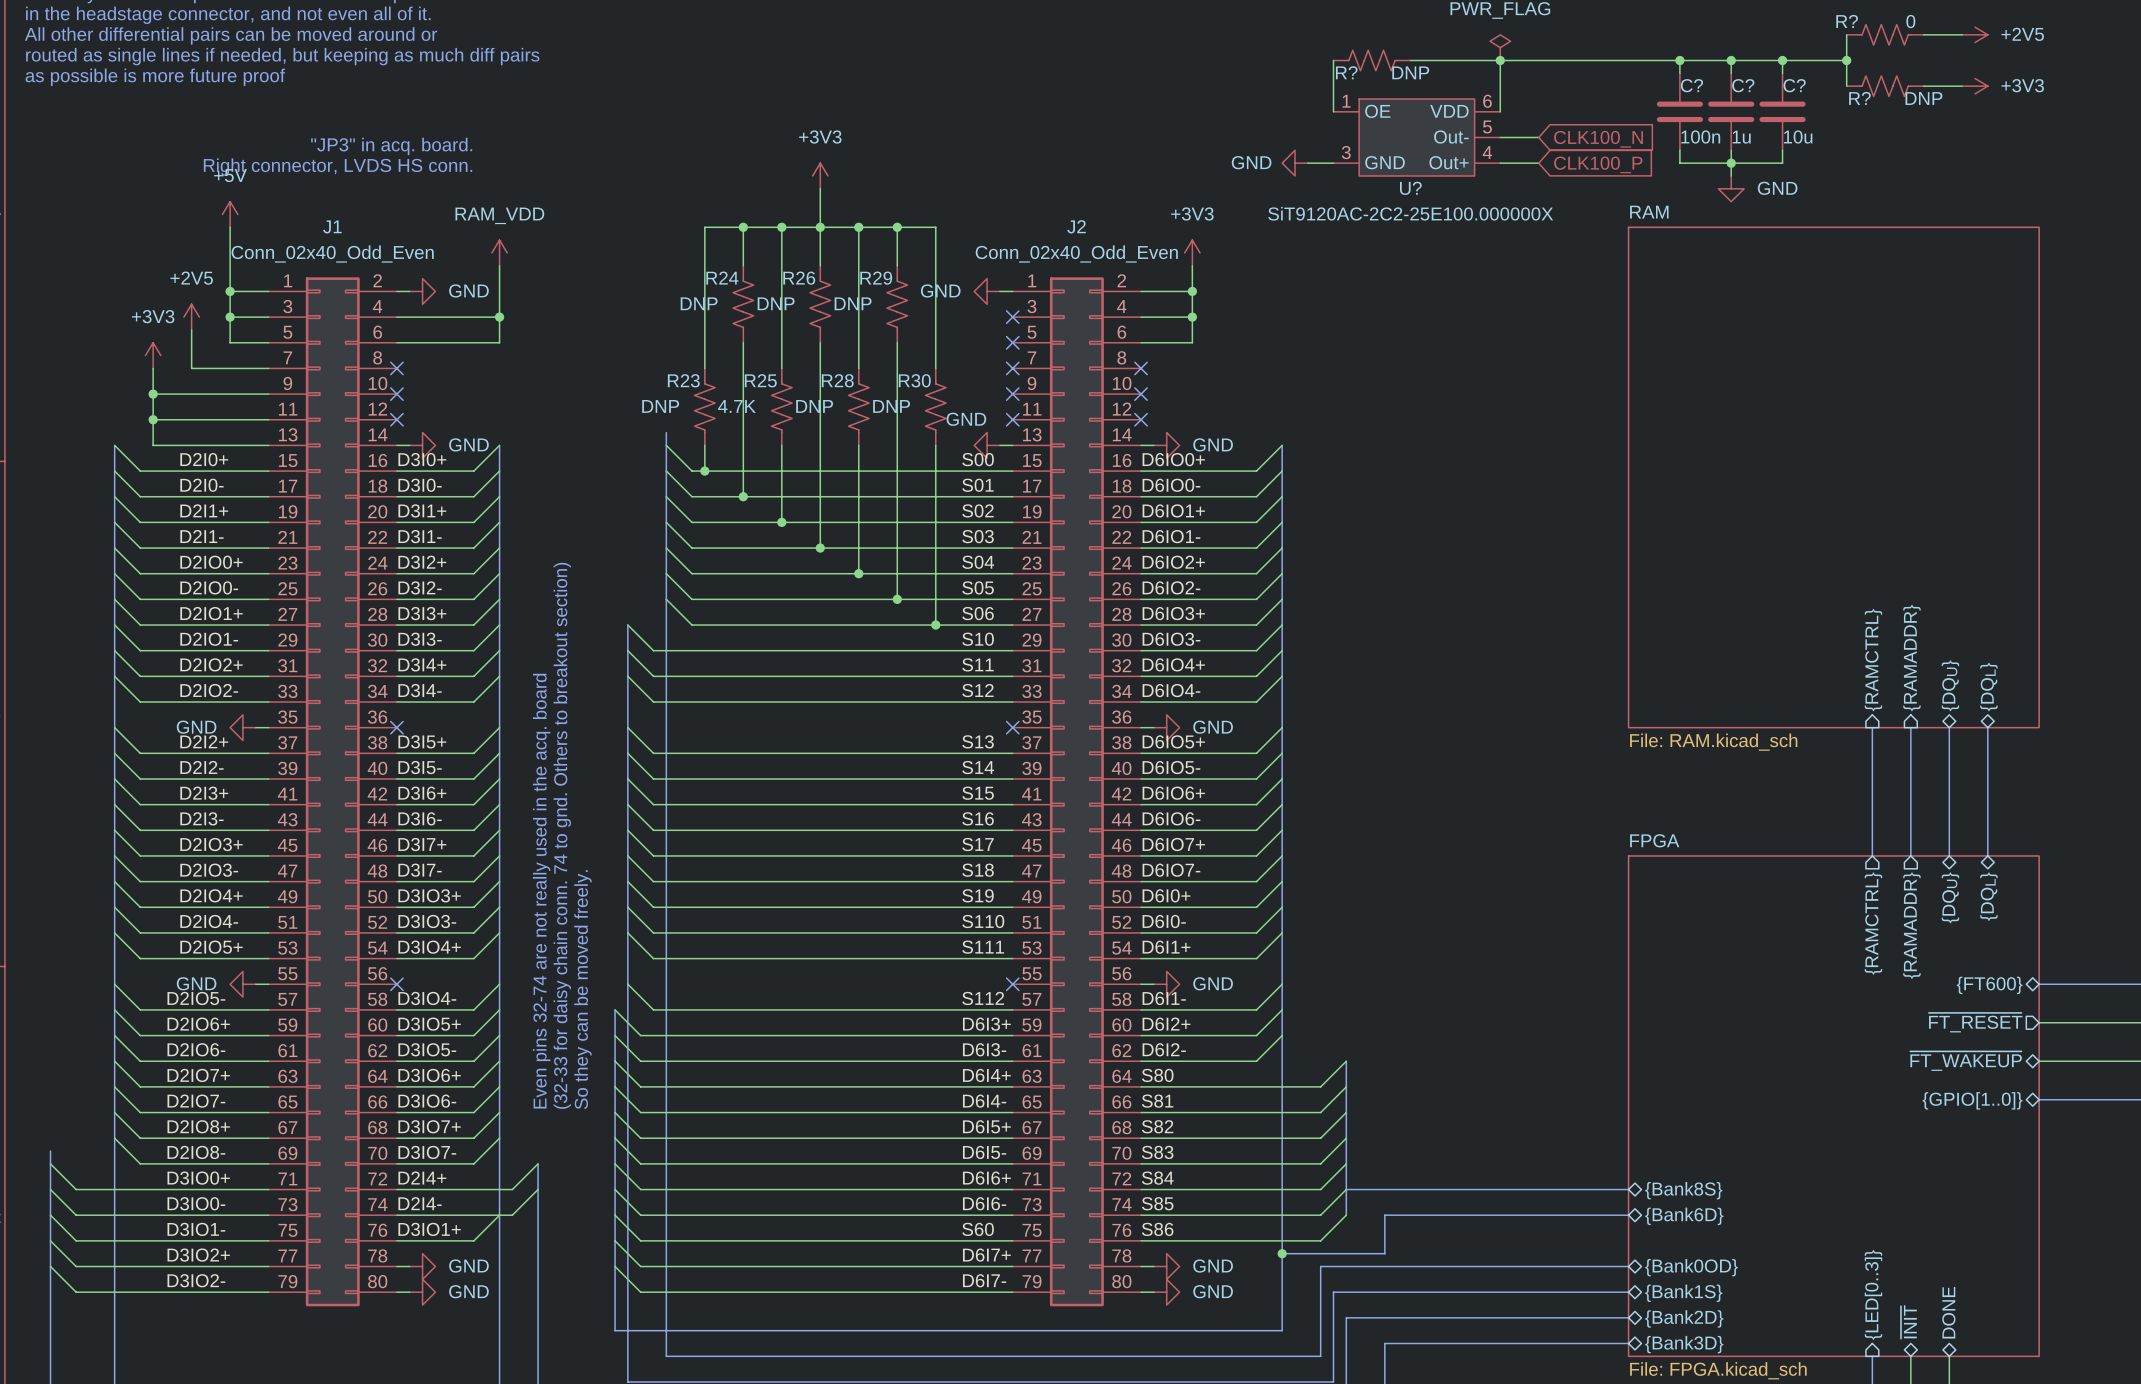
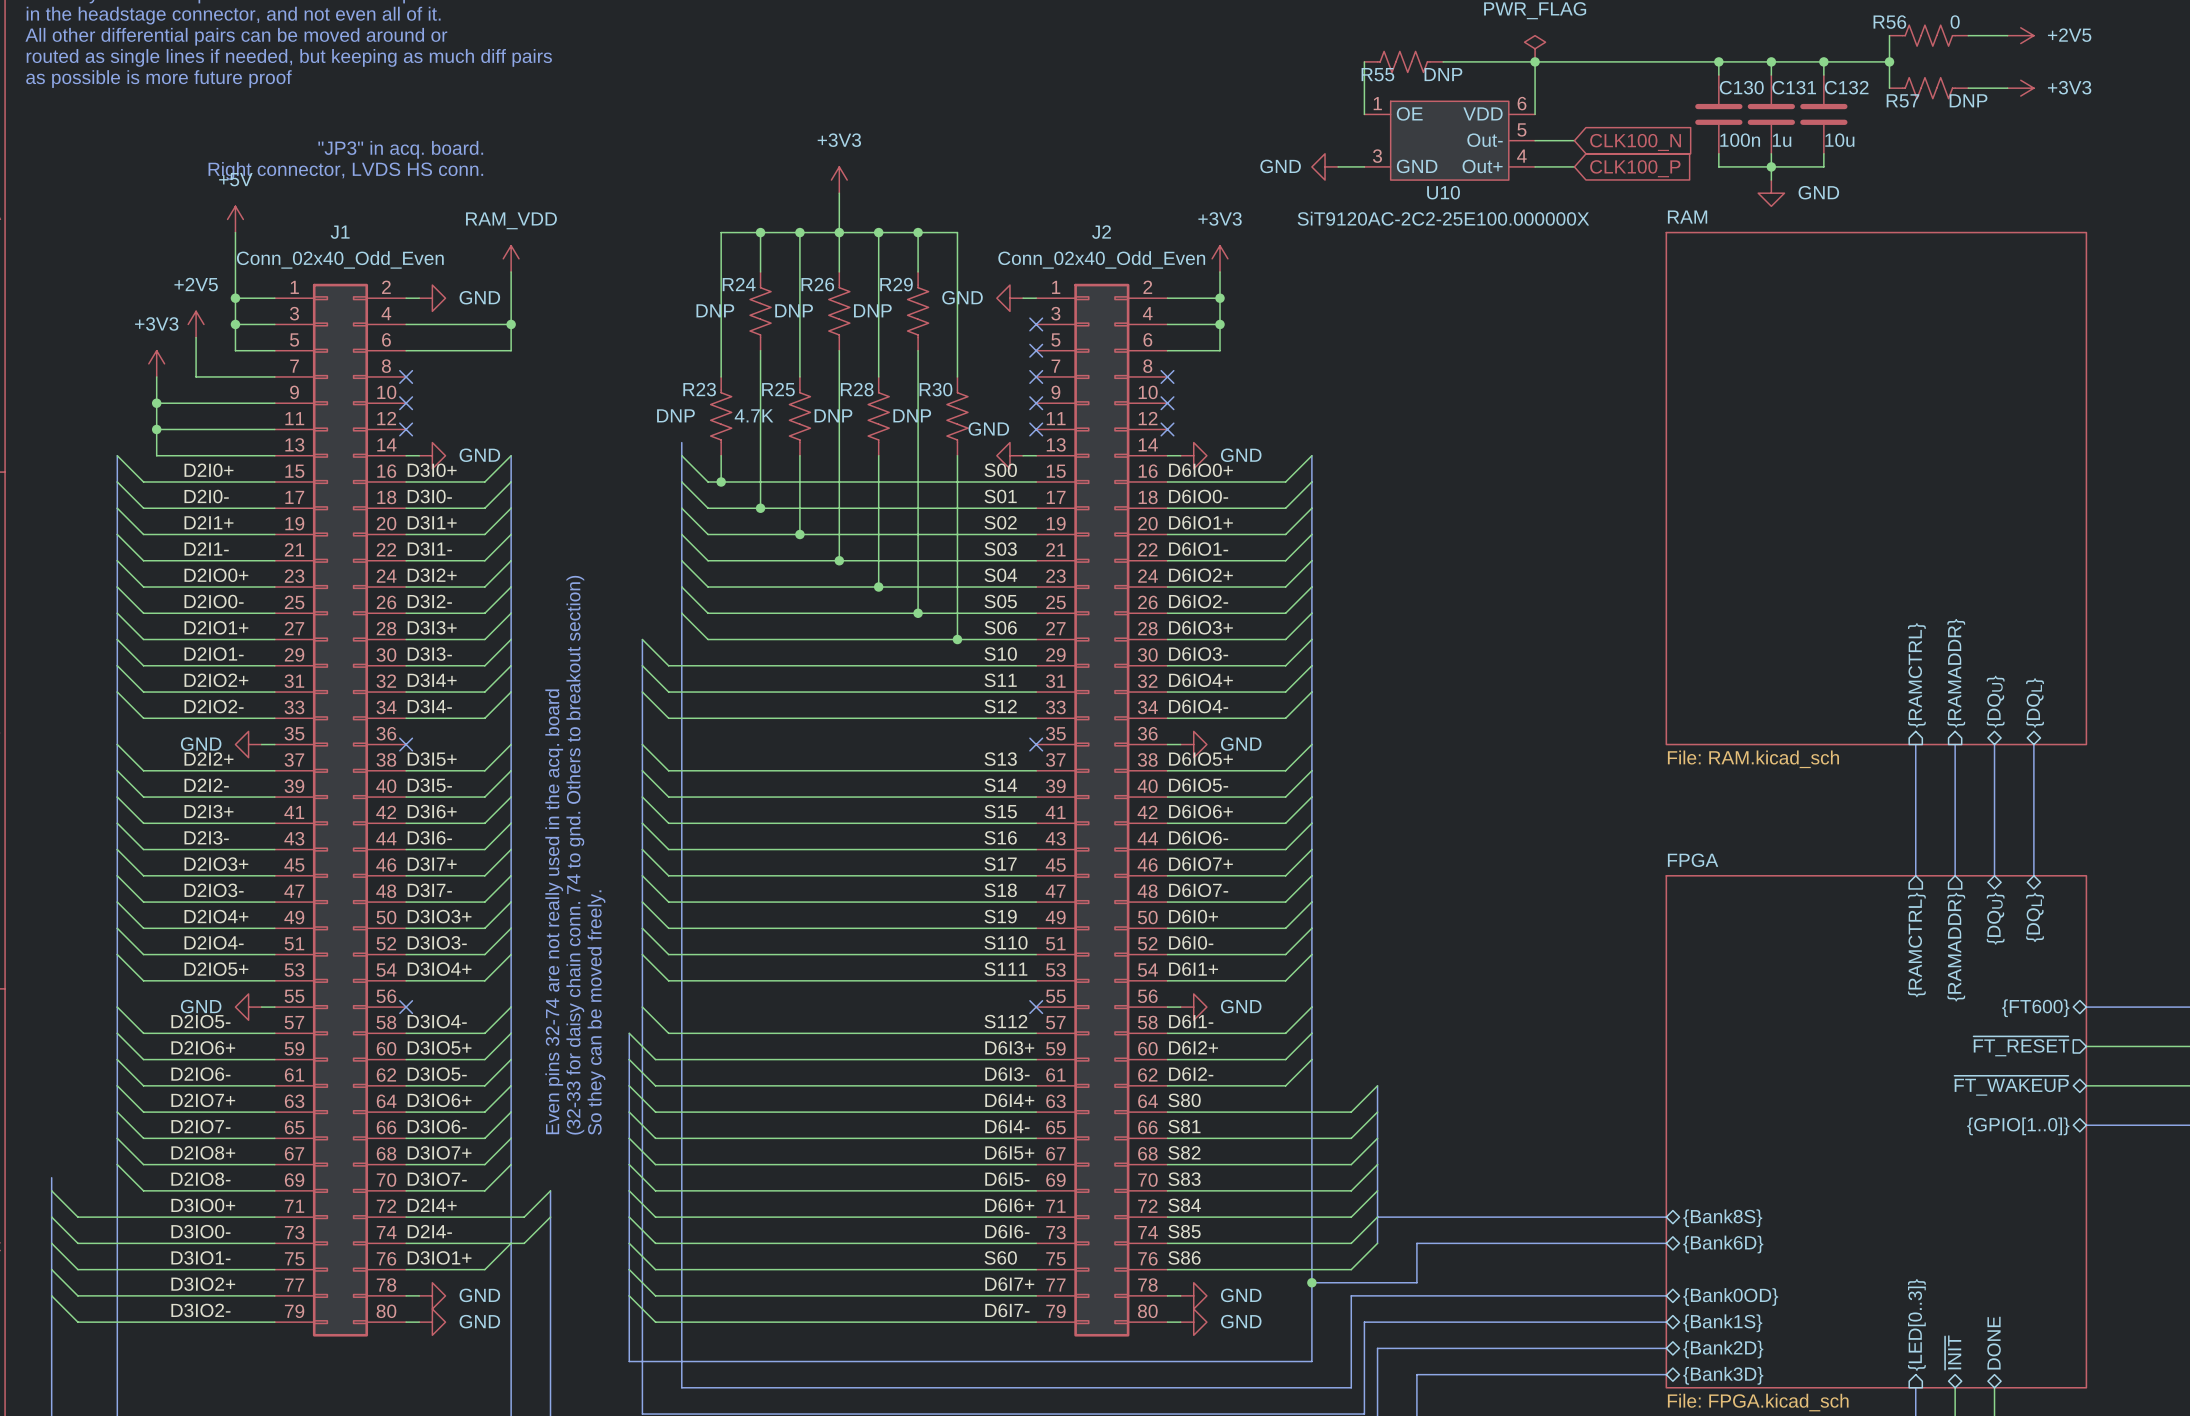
R? name: R? (1847, 21) -> R56 (1889, 22)
R? name: R? (1346, 72) -> R55 (1377, 74)
C? name: C? (1691, 85) -> C130 (1741, 87)
C? name: C? (1743, 85) -> C131 (1794, 87)
C? name: C? (1794, 85) -> C132 (1846, 87)
R? name: R? (1859, 98) -> R57 (1902, 100)
U? name: U? (1410, 188) -> U10 (1443, 192)

